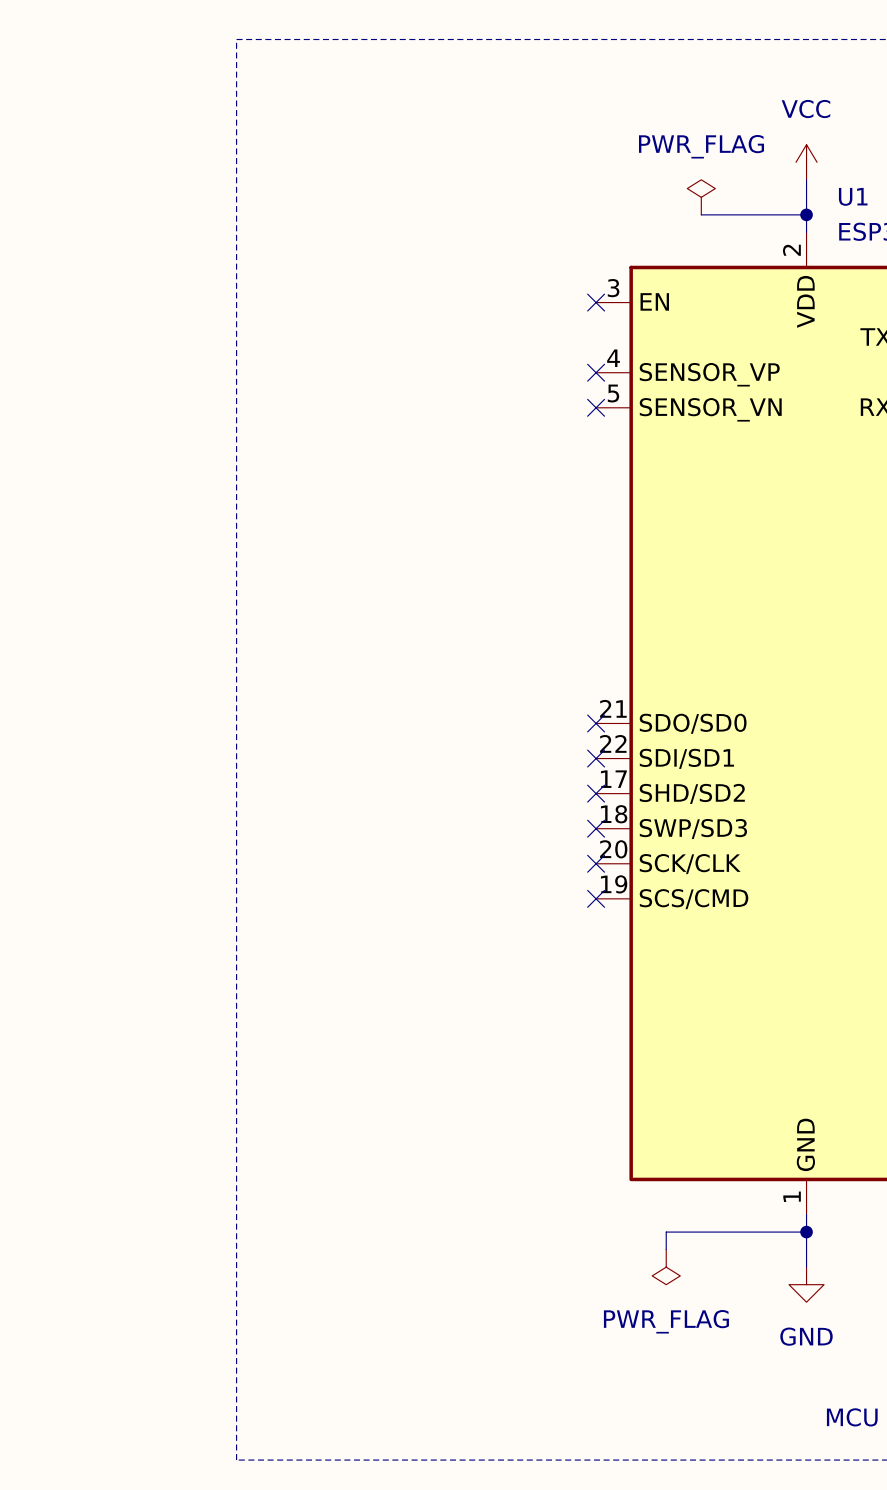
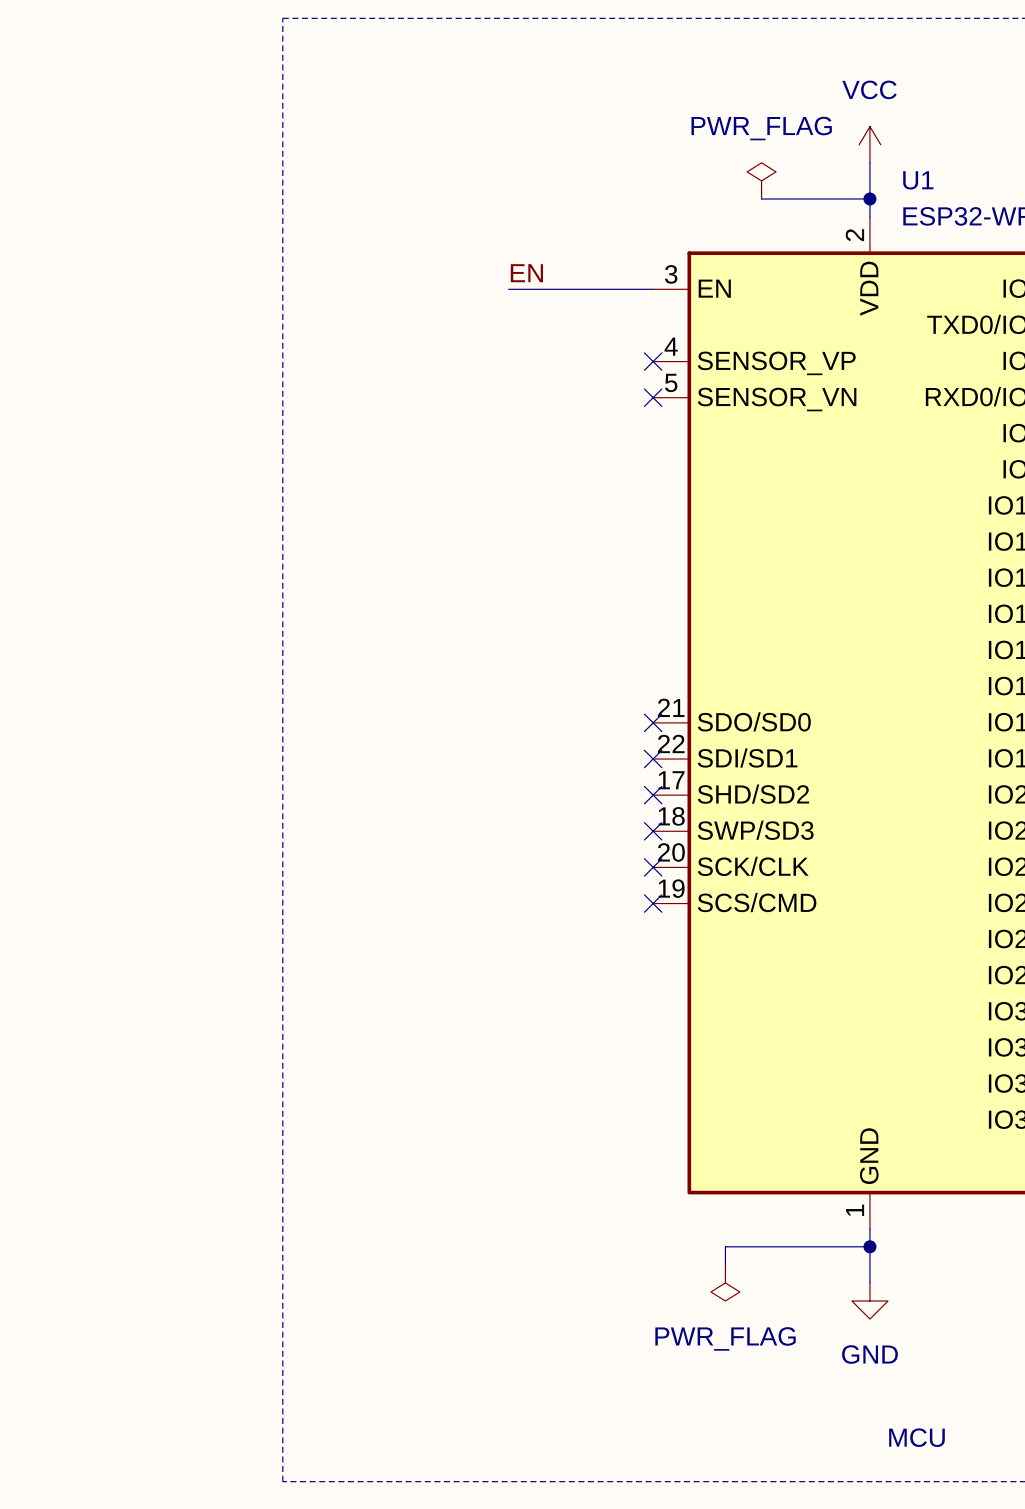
label: none -> EN (526, 273)
wire: none -> (508, 289) (653, 289)
no-connect mark: (596, 302) -> none

